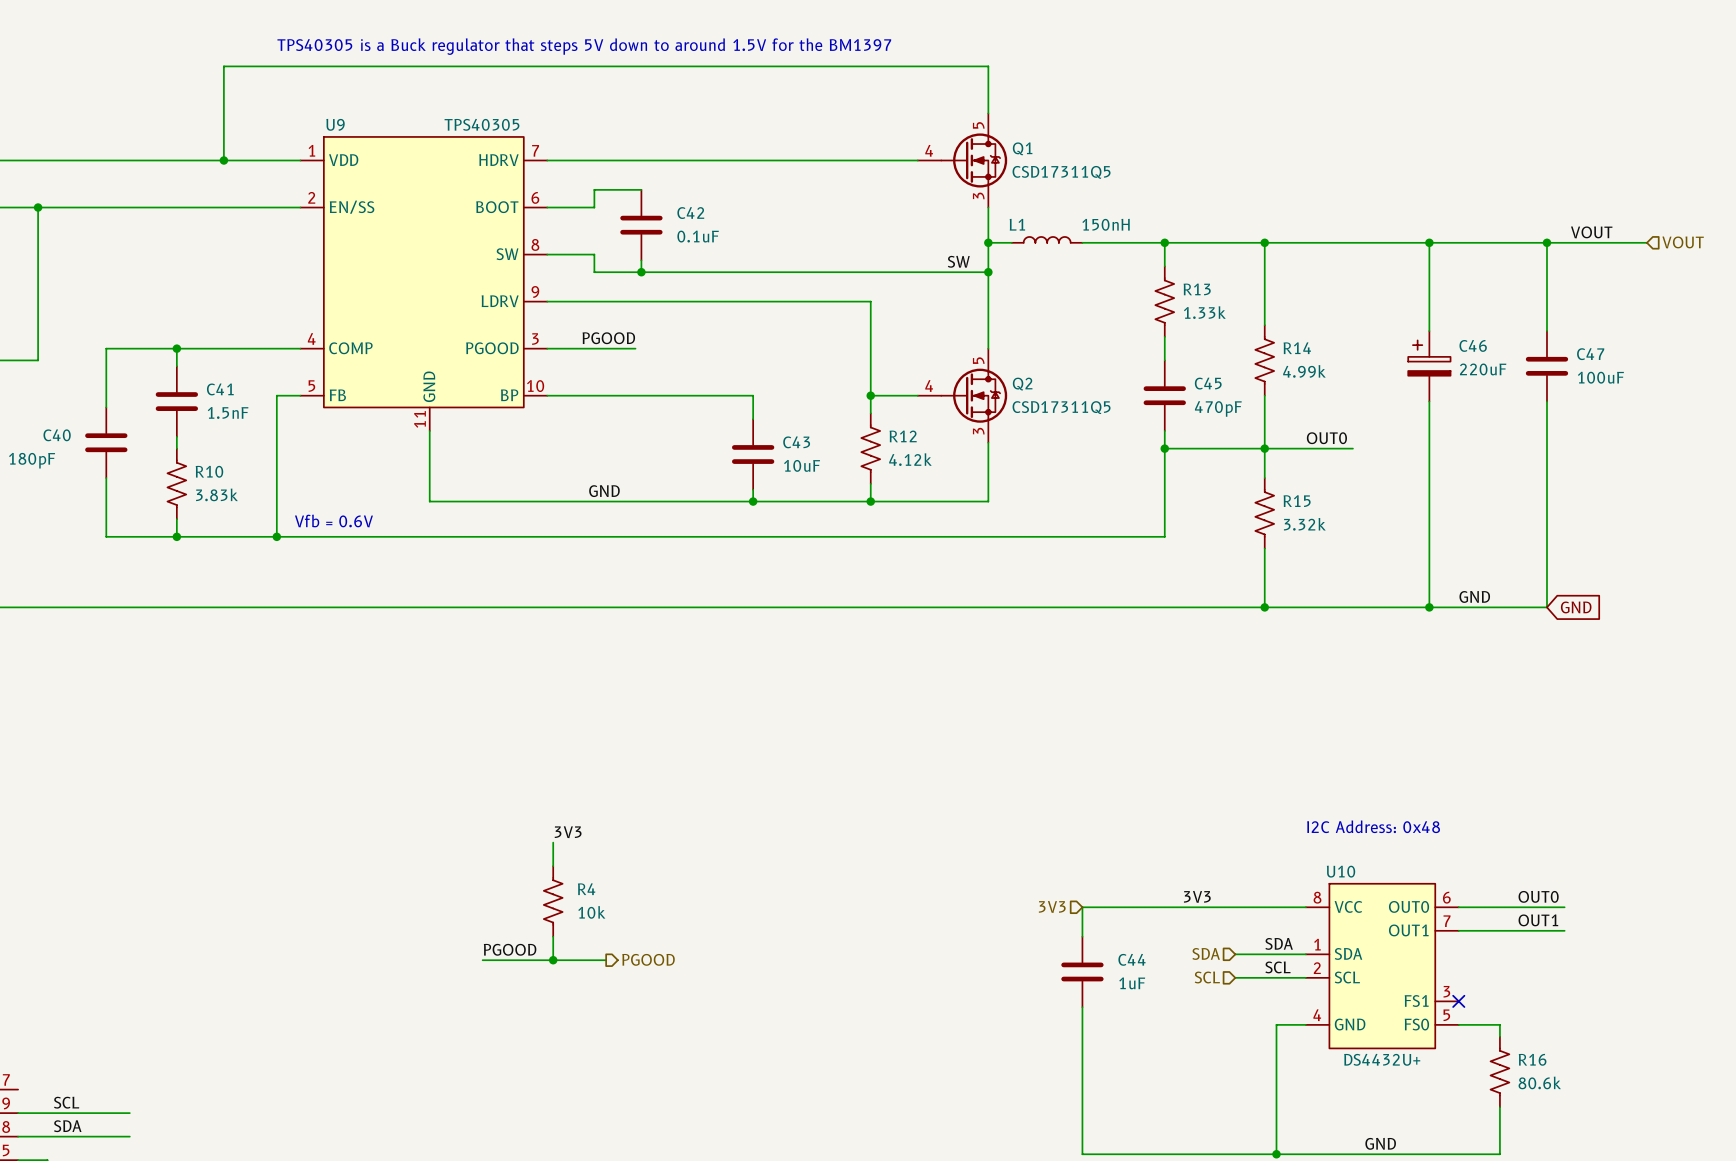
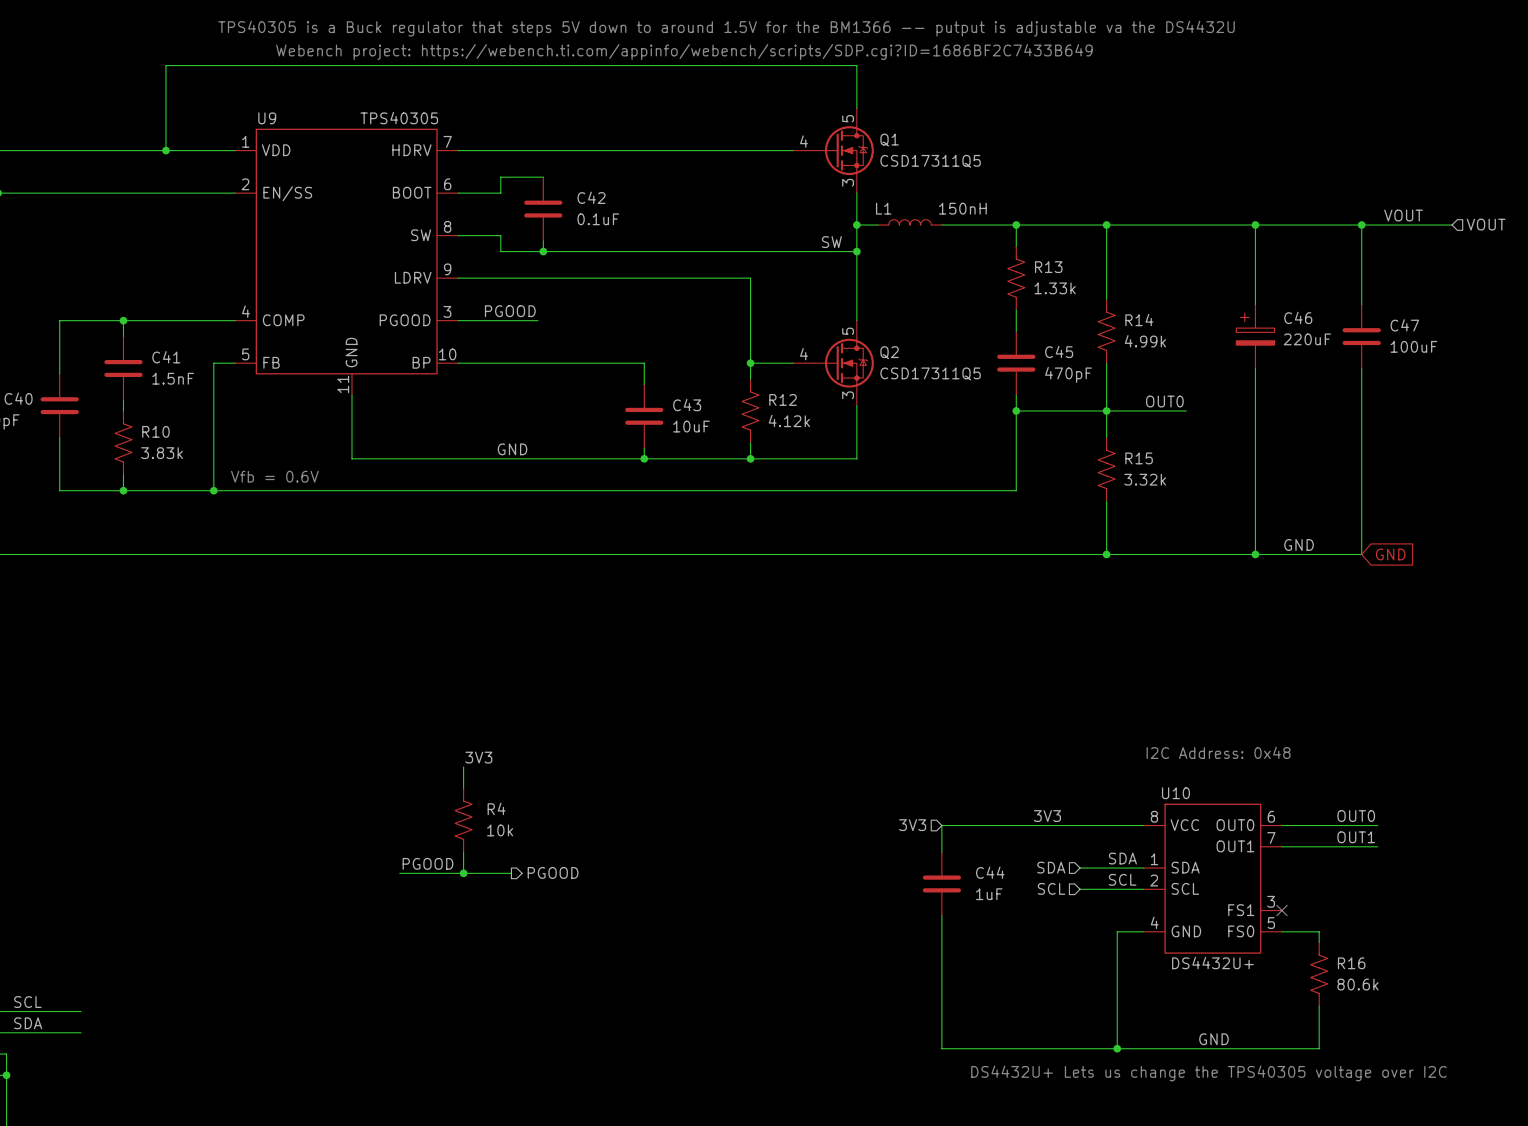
text: TPS40305 is a Buck regulator that steps 5V down to around 1.5V for the BM1397 (584, 46) -> TPS40305 is a Buck regulator that steps 5V down to around 1.5V for the BM1366 -- putput is adjustable va the DS4432U (726, 28)
text: none -> Webench project: https://webench.ti.com/appinfo/webench/scripts/SDP.cgi?ID=1686BF2C7433B649 (684, 52)

